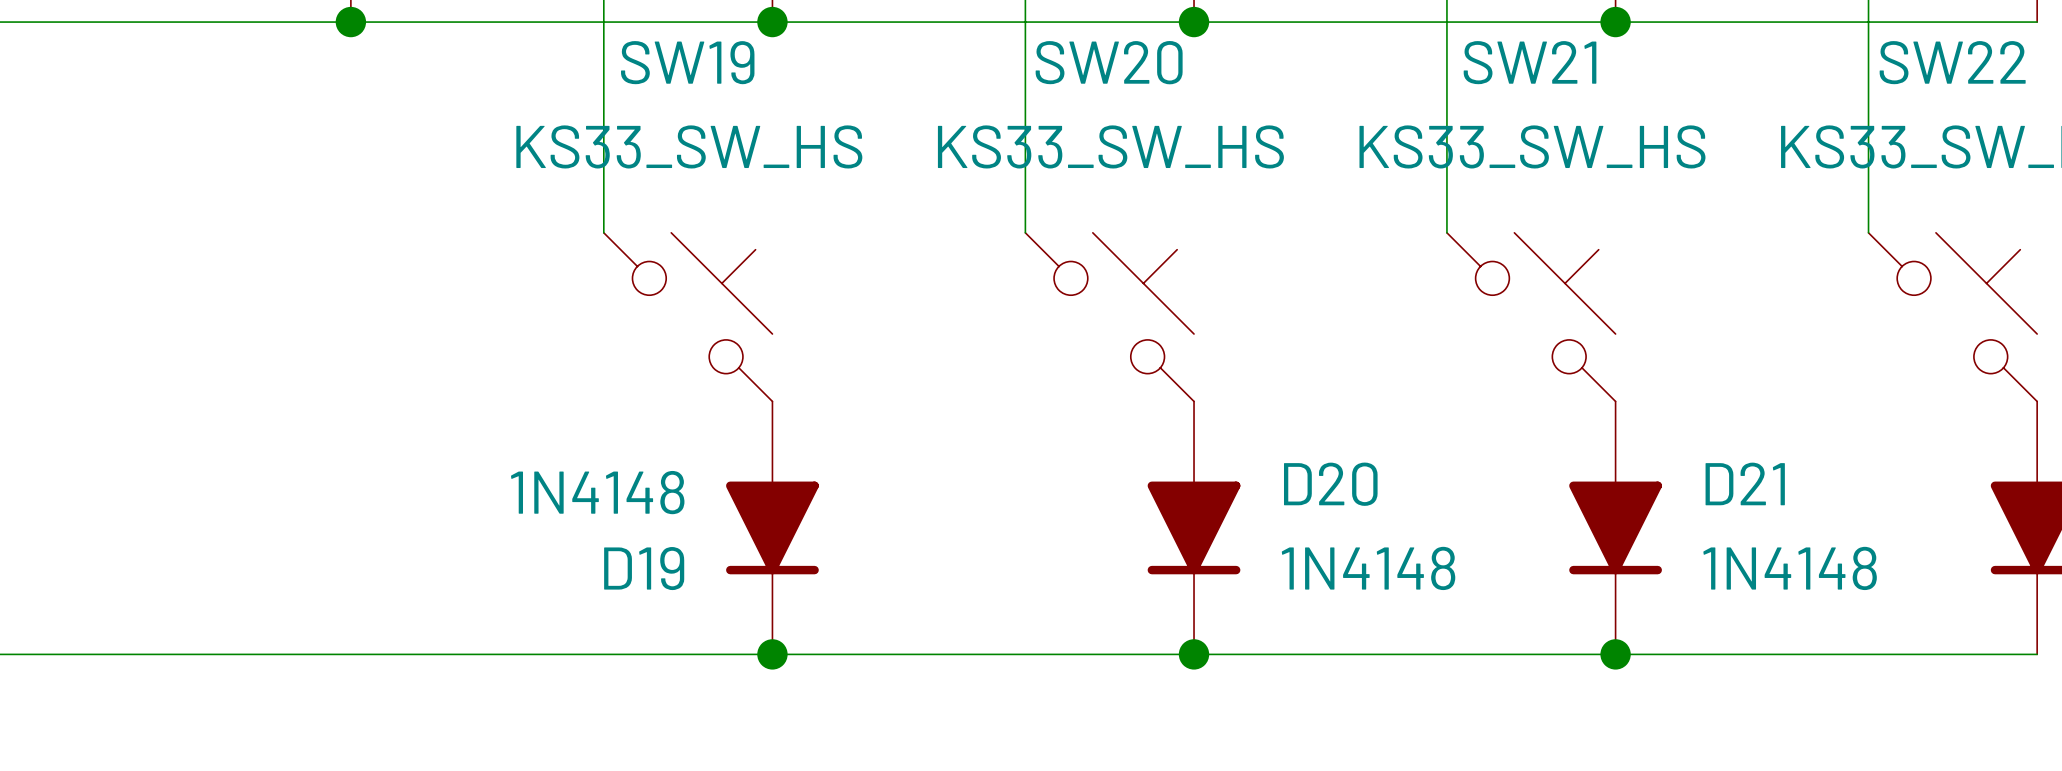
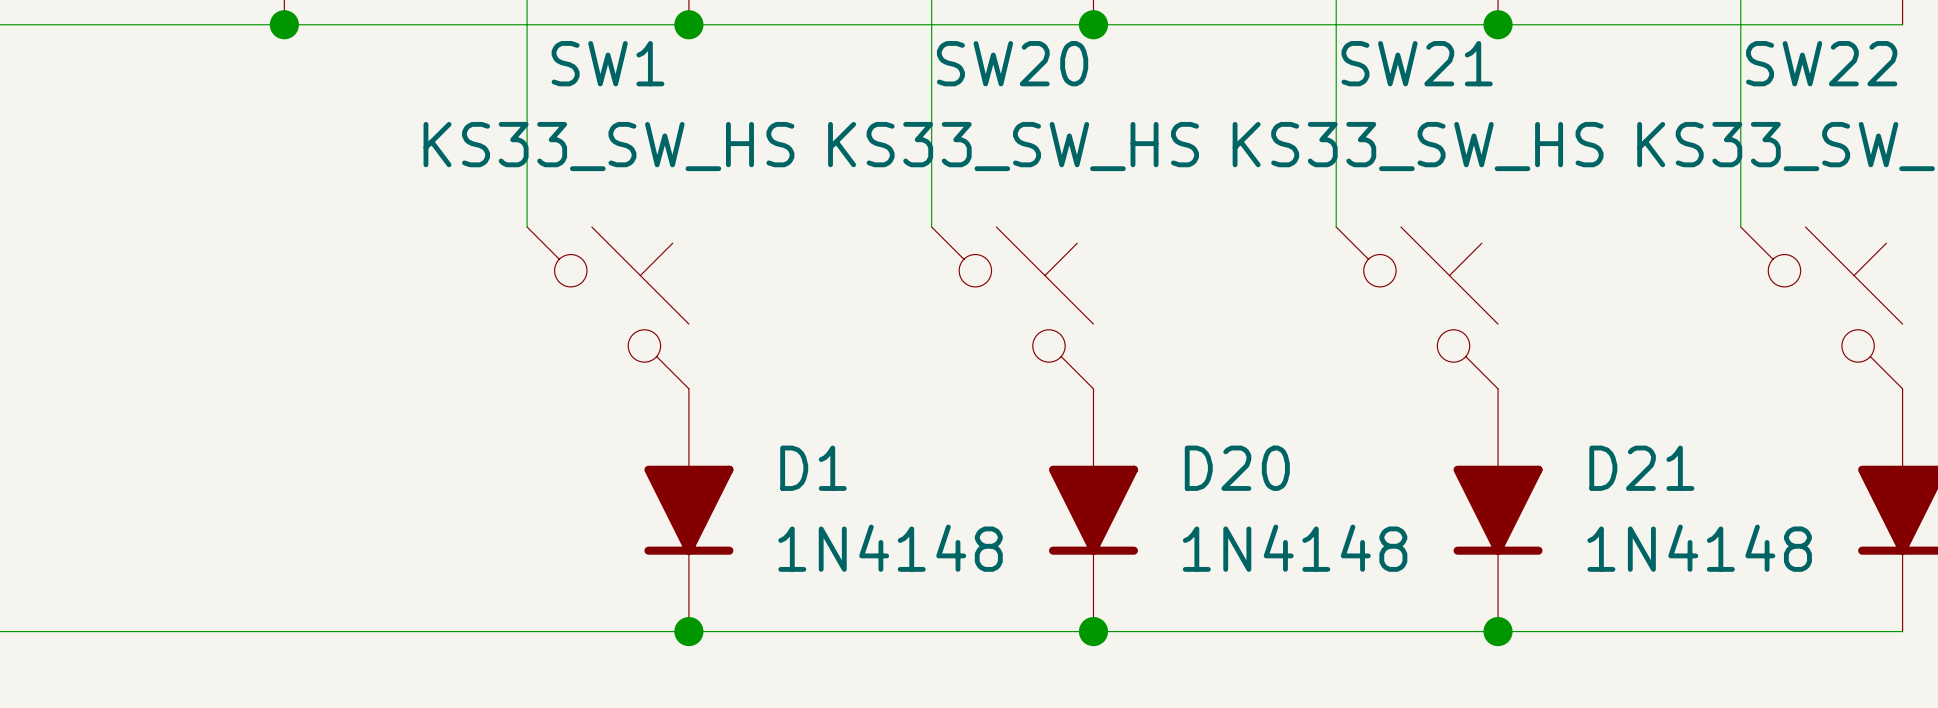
SW19 name: SW19 (687, 62) -> SW1 (608, 63)
D19 value position: 1N4148 (597, 492) -> 1N4148 (890, 548)
D19 name: D19 (644, 568) -> D1 (813, 468)

